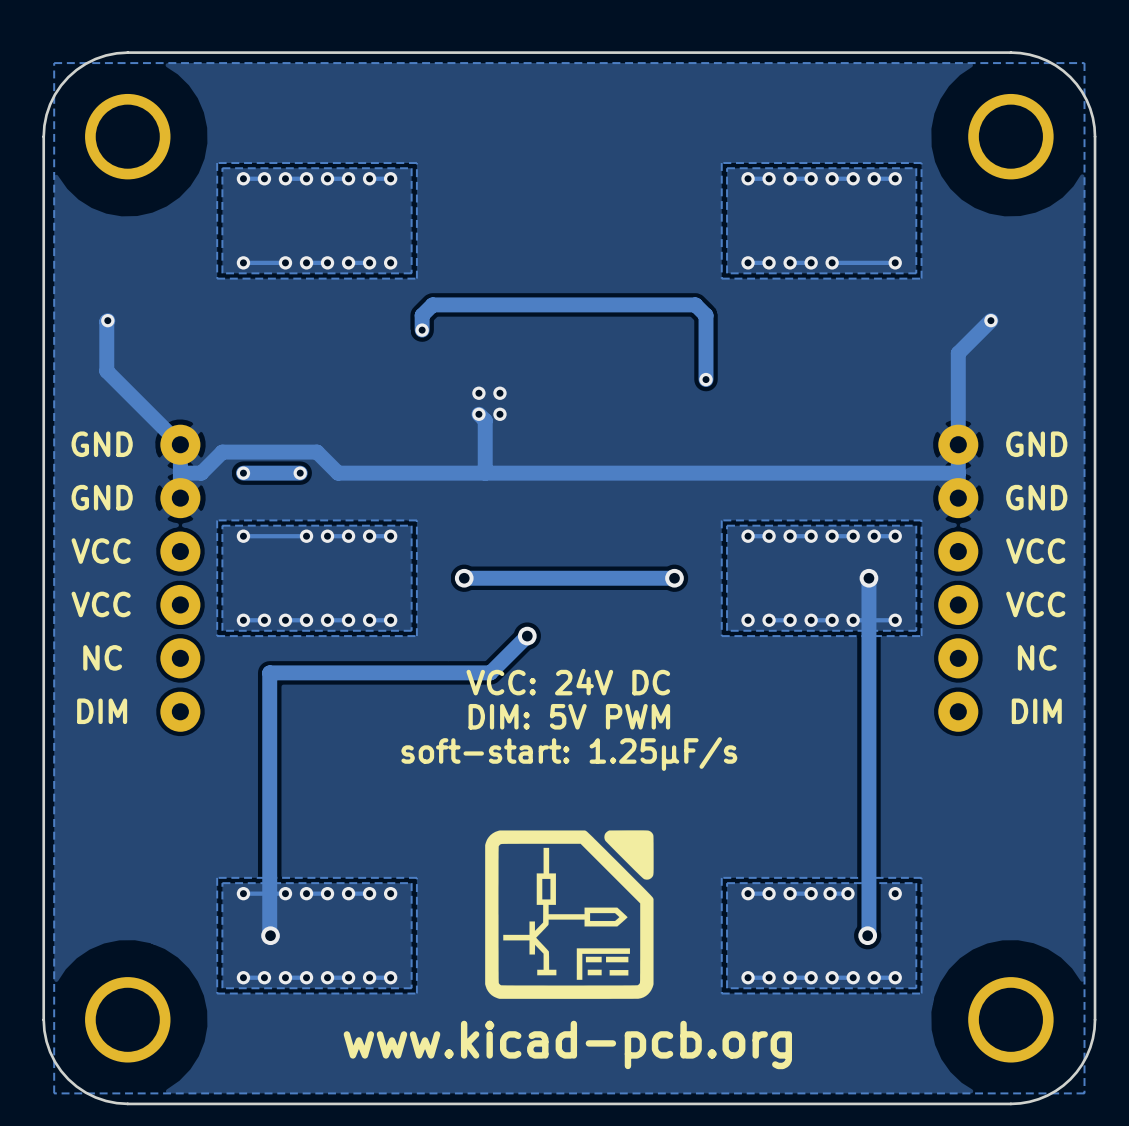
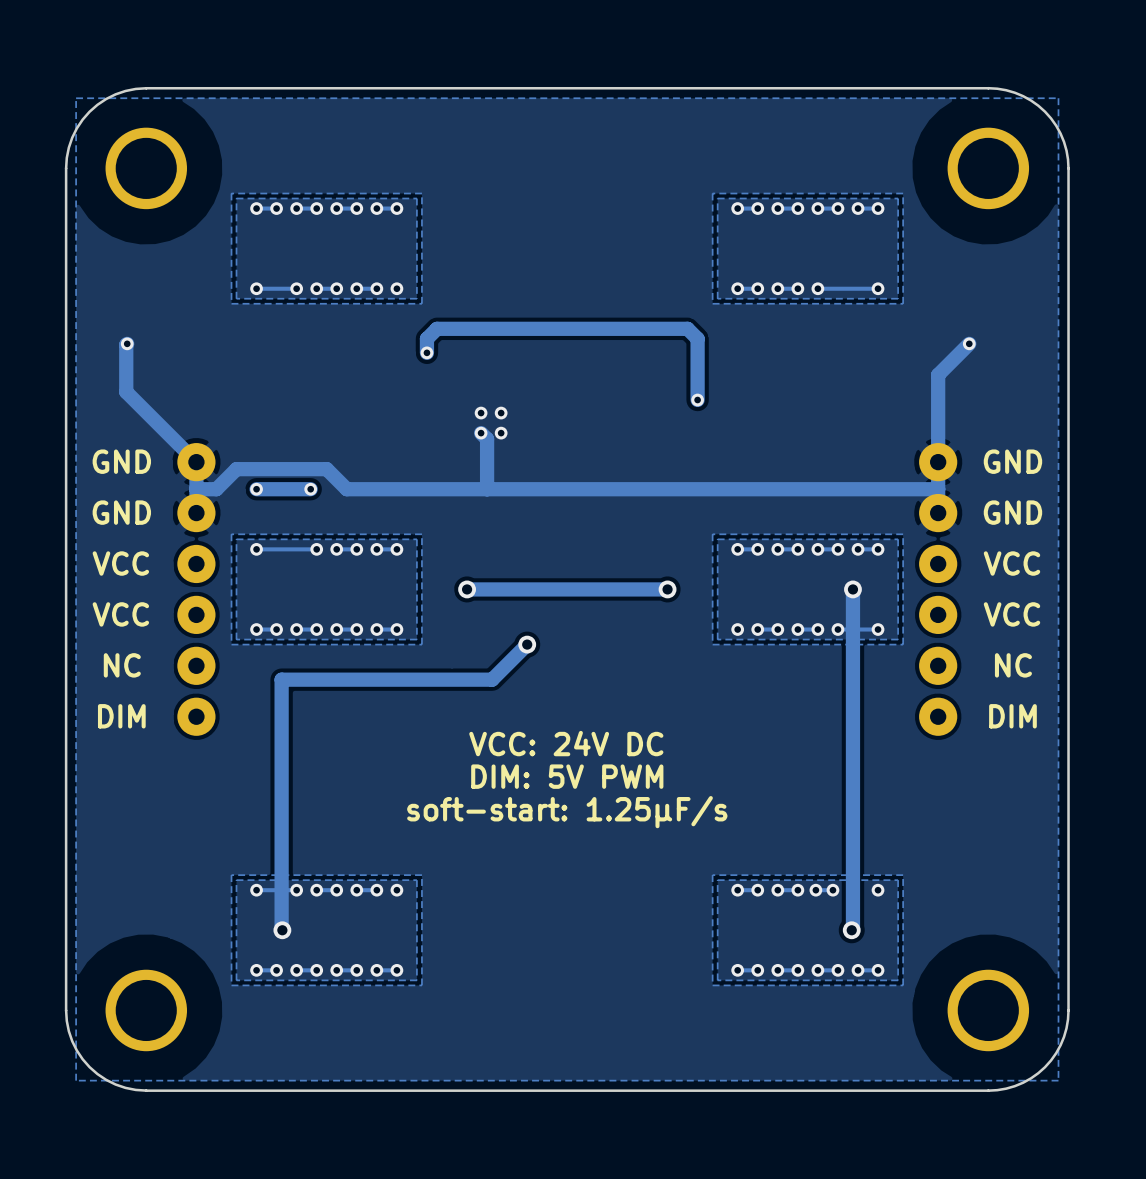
text position: VCC: 24V DC (568, 682) -> VCC: 24V DC (566, 743)
text position: DIM: 5V PWM (569, 716) -> DIM: 5V PWM (567, 776)
text position: soft-start: 1.25µF/s (569, 754) -> soft-start: 1.25µF/s (567, 812)
drawing: [485, 830, 654, 999] -> none
text: www.kicad-pcb.org (567, 1044) -> none

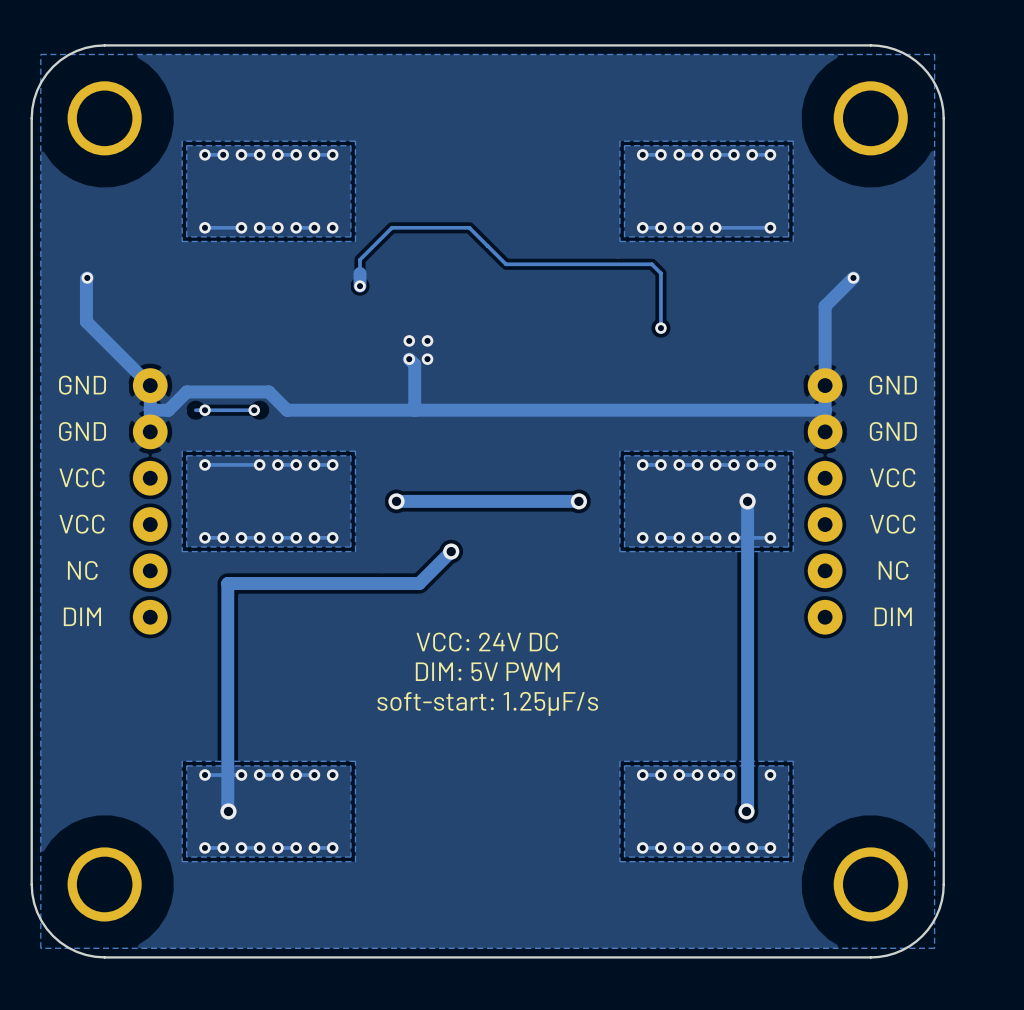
track: (587, 328) (436, 328) (426, 338) -> (506, 264) (469, 227) (391, 227) (360, 259) (360, 273)
track: (687, 328) (697, 338) (697, 400) -> (597, 264) (651, 264) (660, 273) (660, 328)
track width: thick (687, 328) (587, 328) -> thin (597, 264) (506, 264)
via position: (697, 400) -> (660, 328)
track: none -> (204, 410) (195, 410)
track width: thick (310, 489) (256, 489) -> thin (254, 410) (204, 410)

